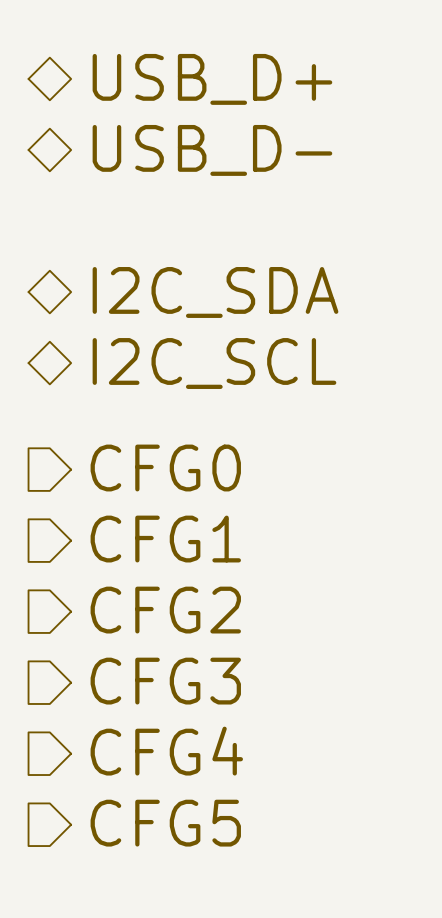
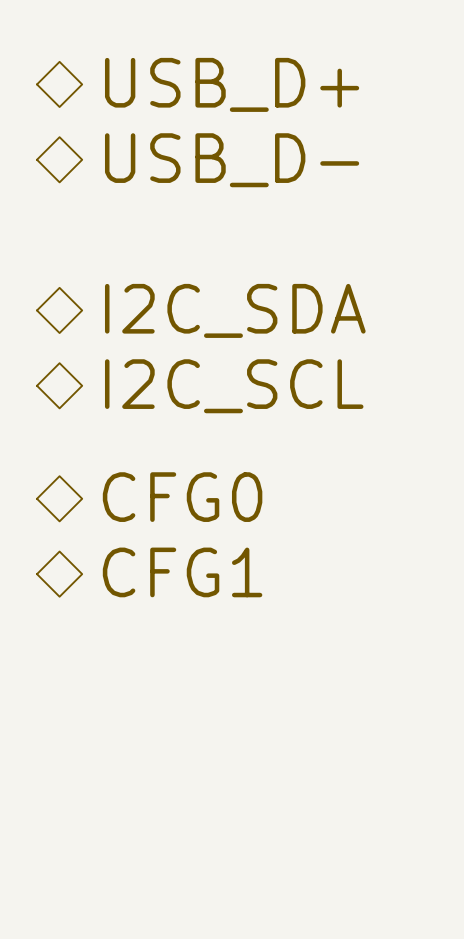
hierarchical label shape: output (165, 468) -> bidirectional (182, 497)
hierarchical label shape: output (165, 539) -> bidirectional (182, 572)
hierarchical label: CFG2 (165, 610) -> none
hierarchical label: CFG3 (165, 681) -> none
hierarchical label: CFG4 (166, 751) -> none
hierarchical label: CFG5 (165, 823) -> none

